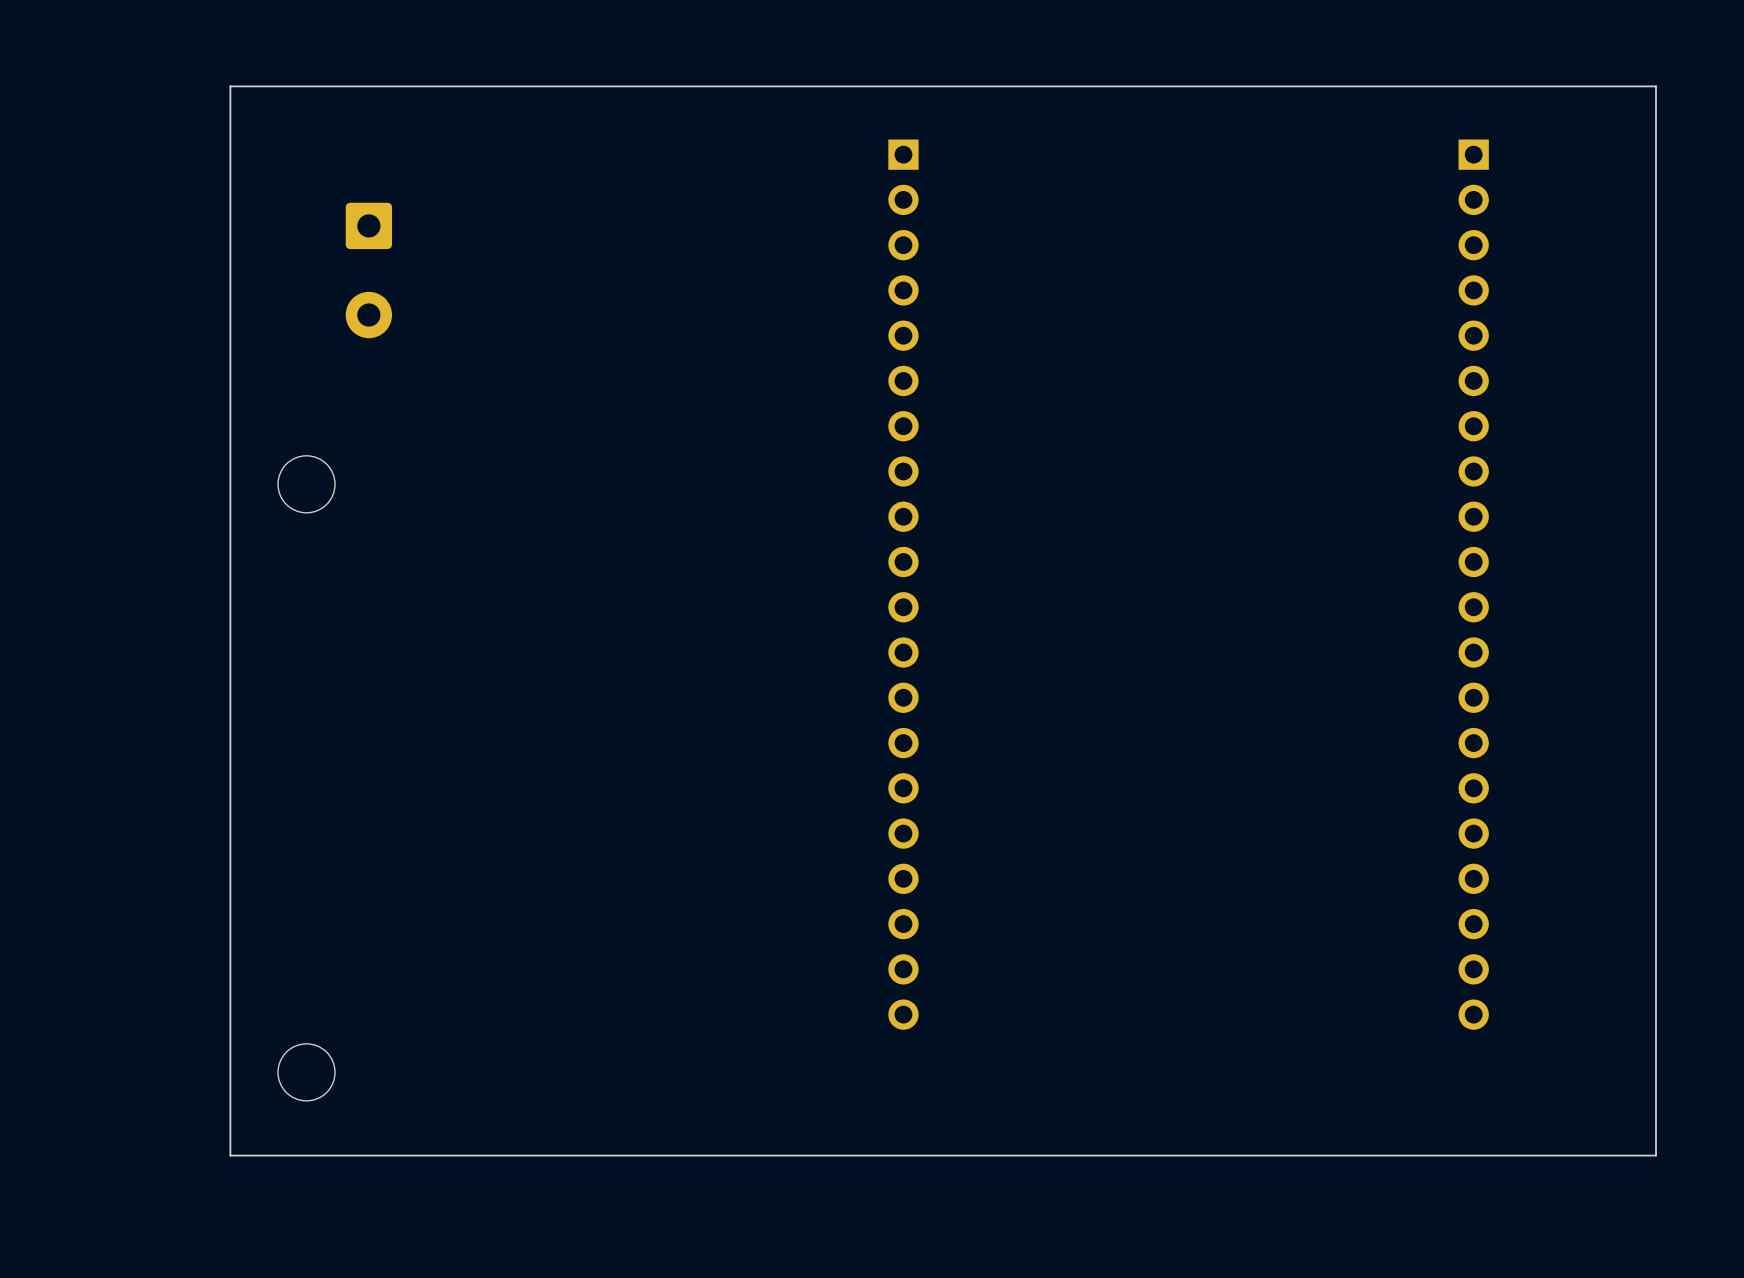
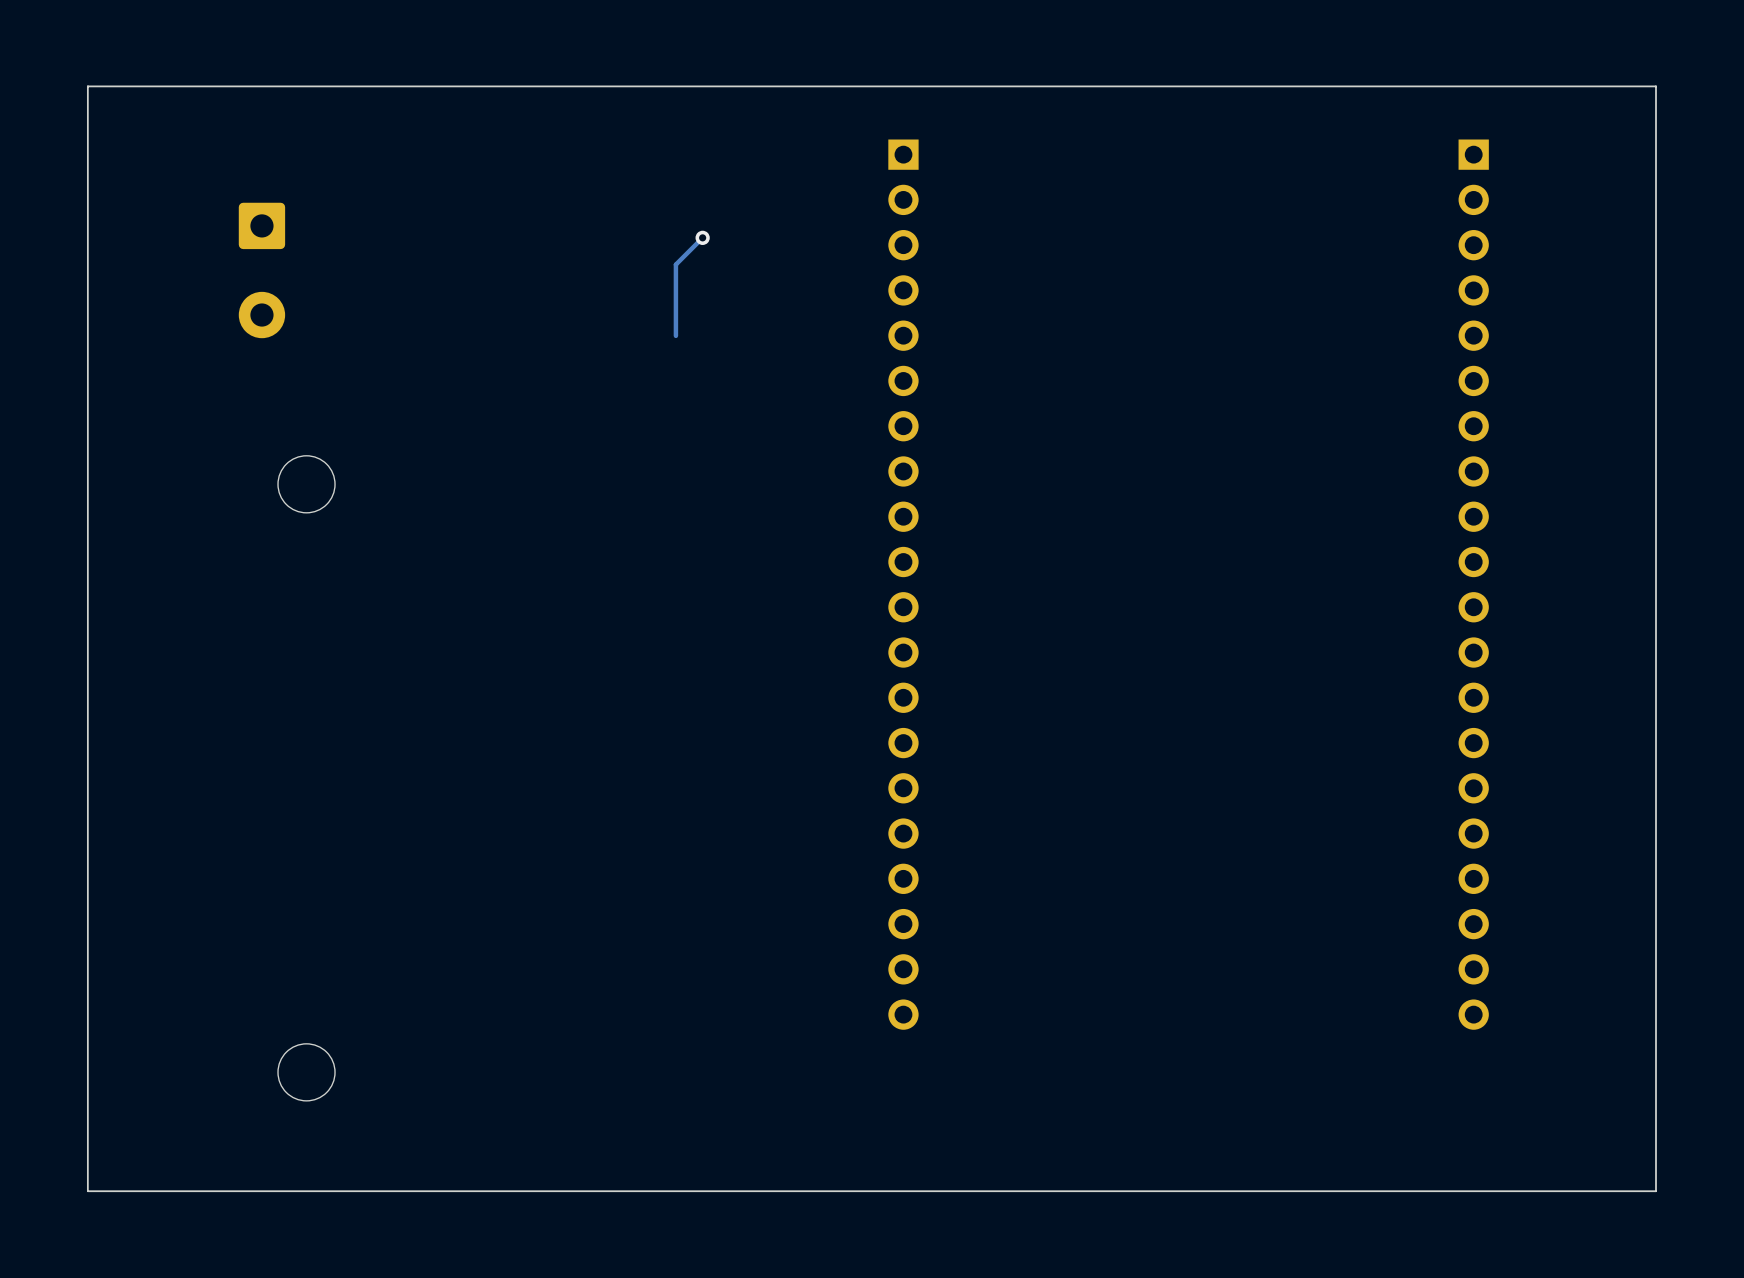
board edge: (230, 86) (230, 1155) (1656, 1155) -> (230, 86) (87, 86) (87, 1191) (1656, 1191) (1656, 1155)
track: none -> (702, 237) (675, 264) (675, 335)
via: none -> (702, 237)
part position: (368, 270) -> (261, 270)

